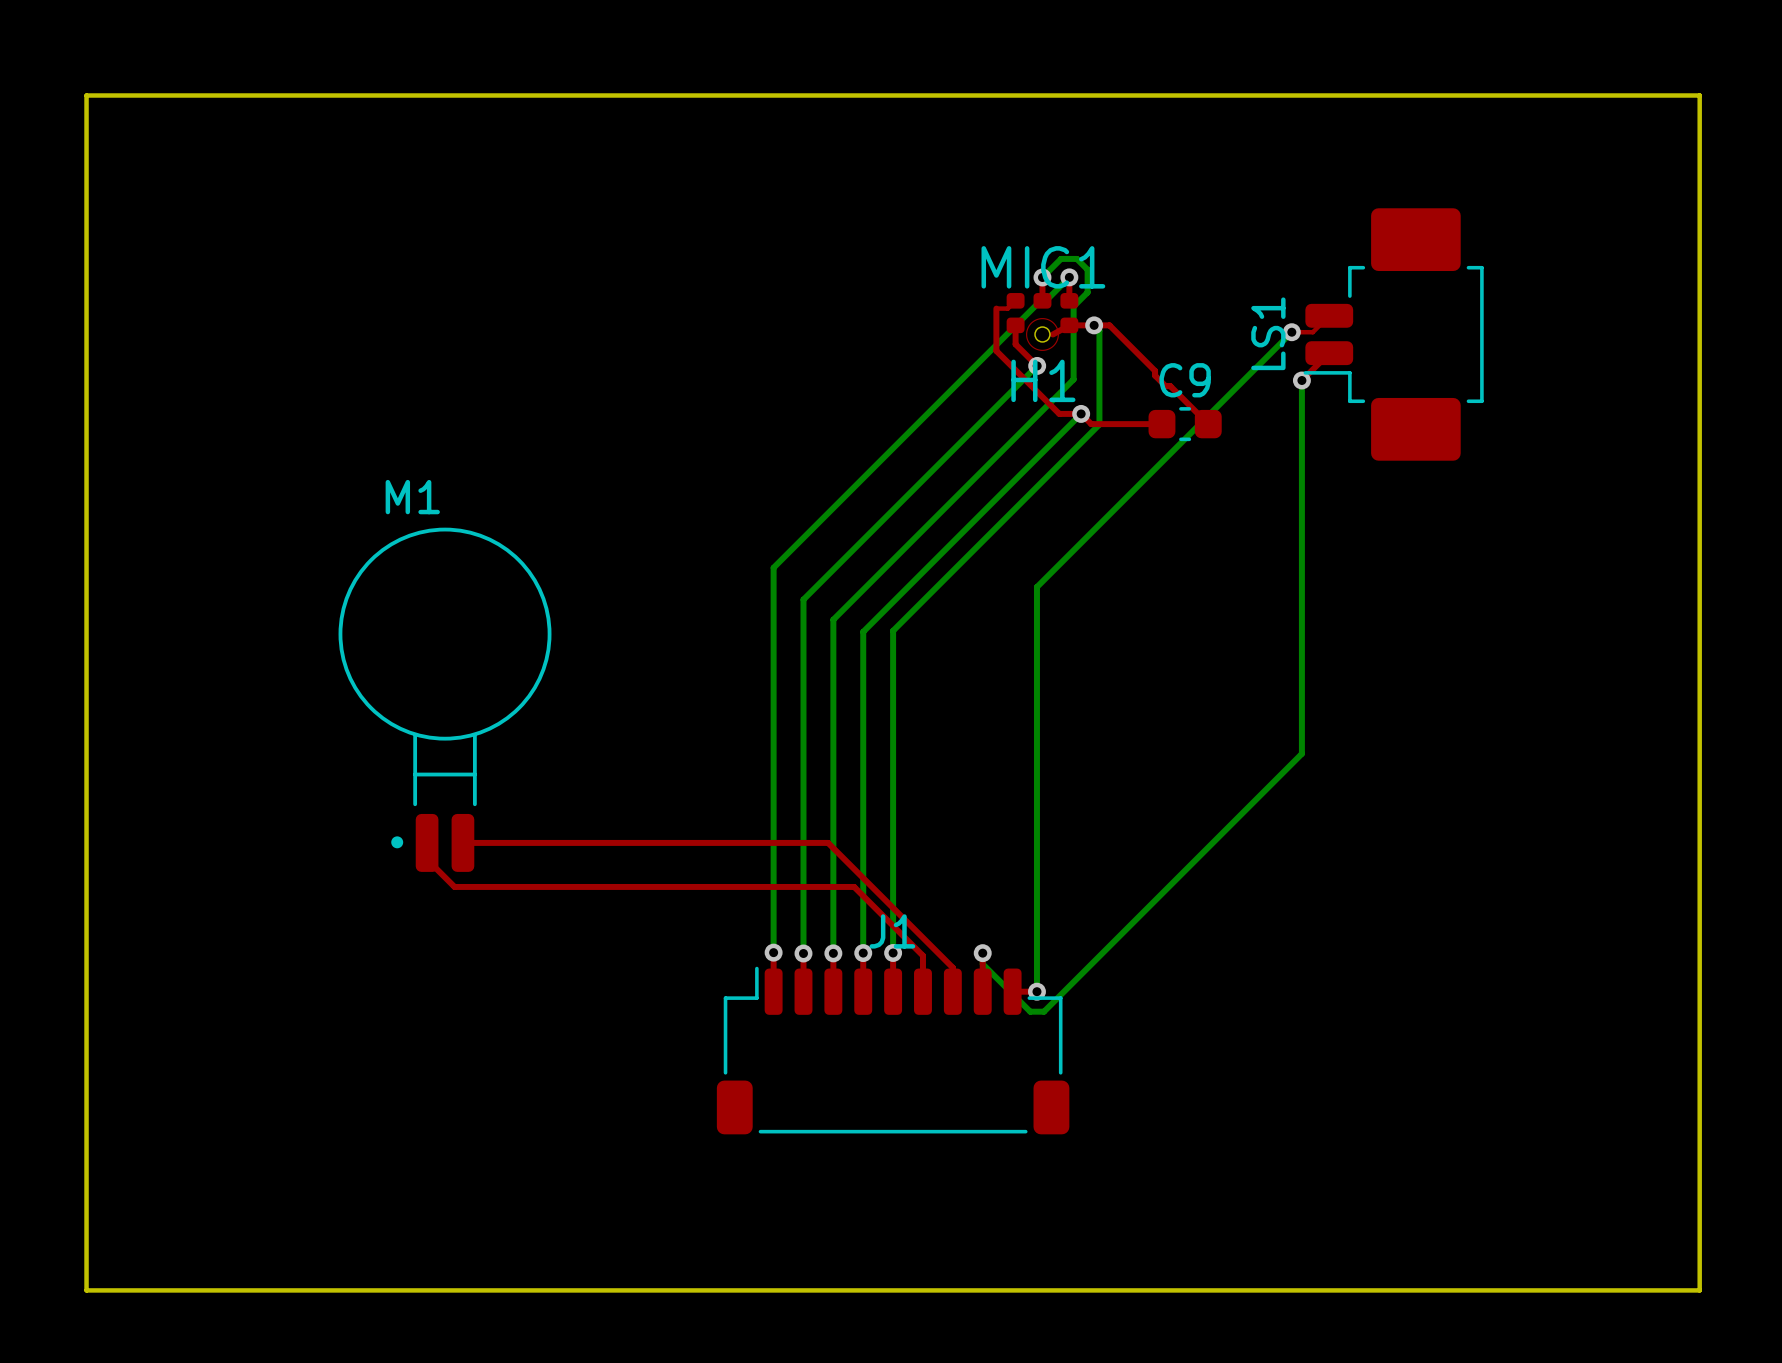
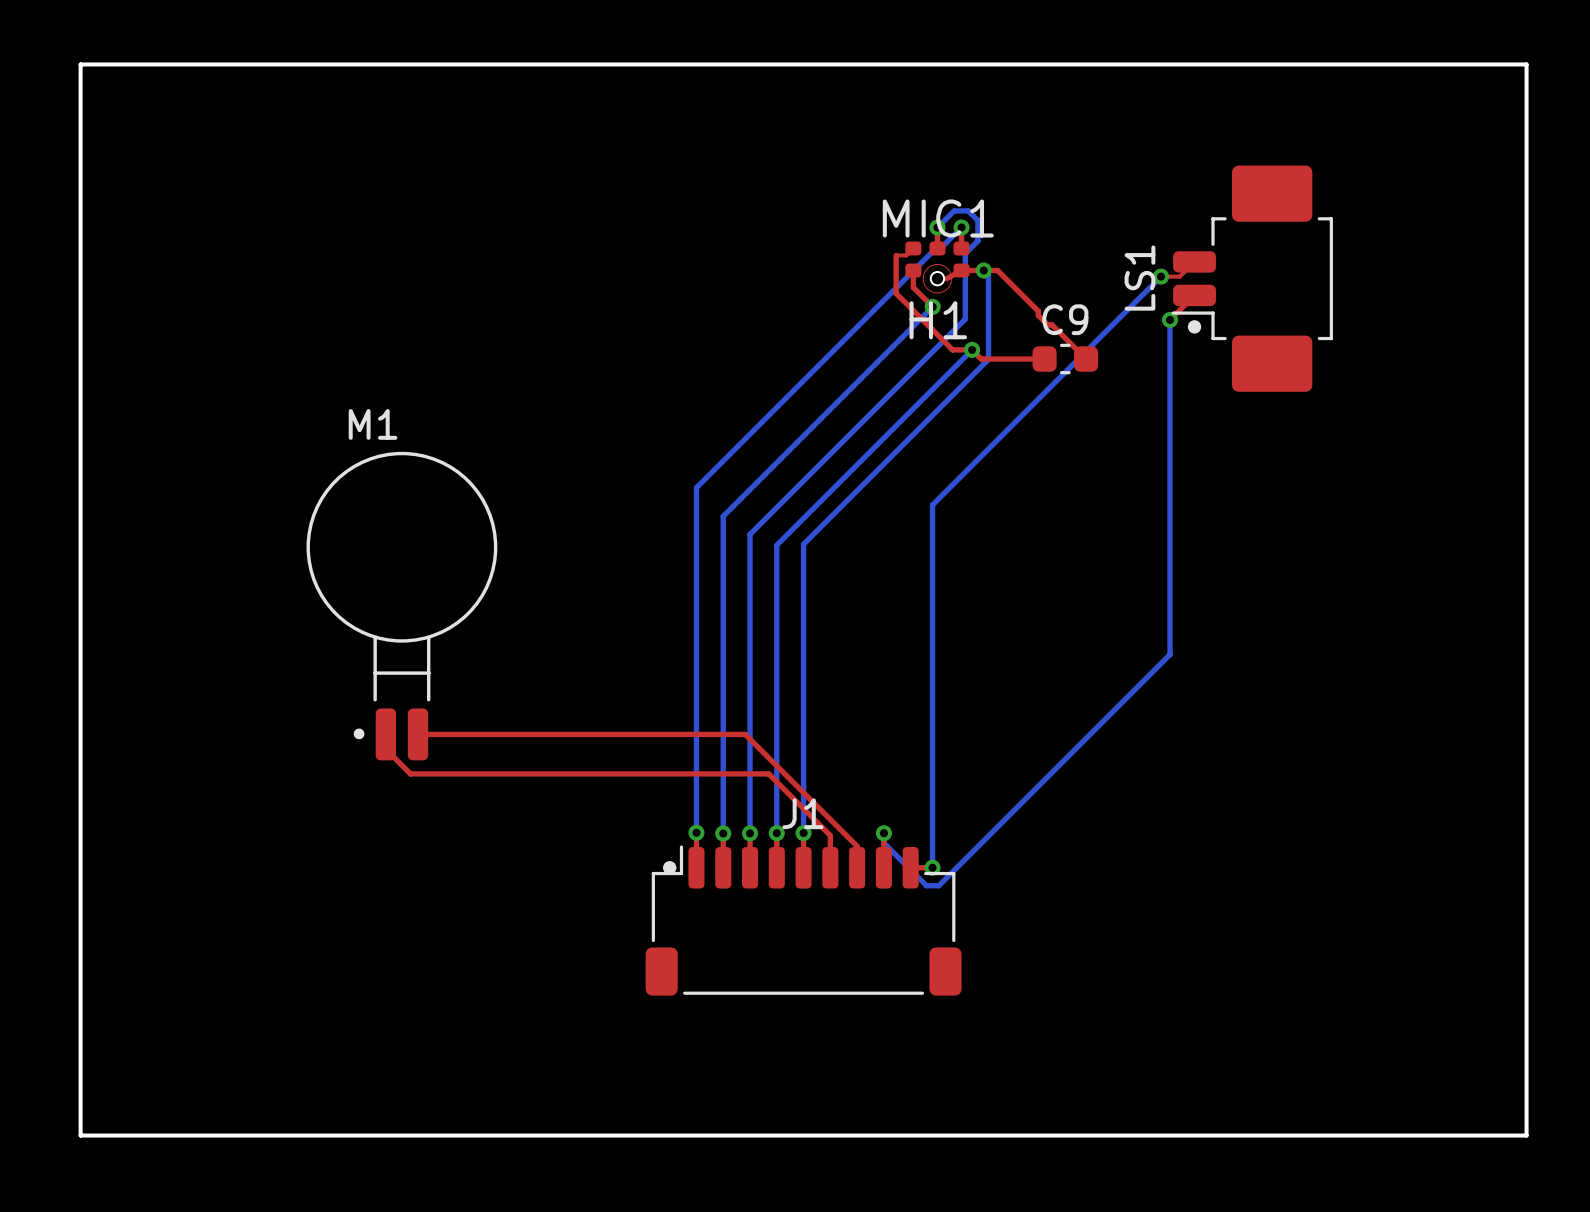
LS1 footprint: [1303, 208, 1484, 461] -> [1171, 165, 1333, 392]
J1 footprint: [716, 966, 1070, 1135] -> [645, 845, 962, 996]

